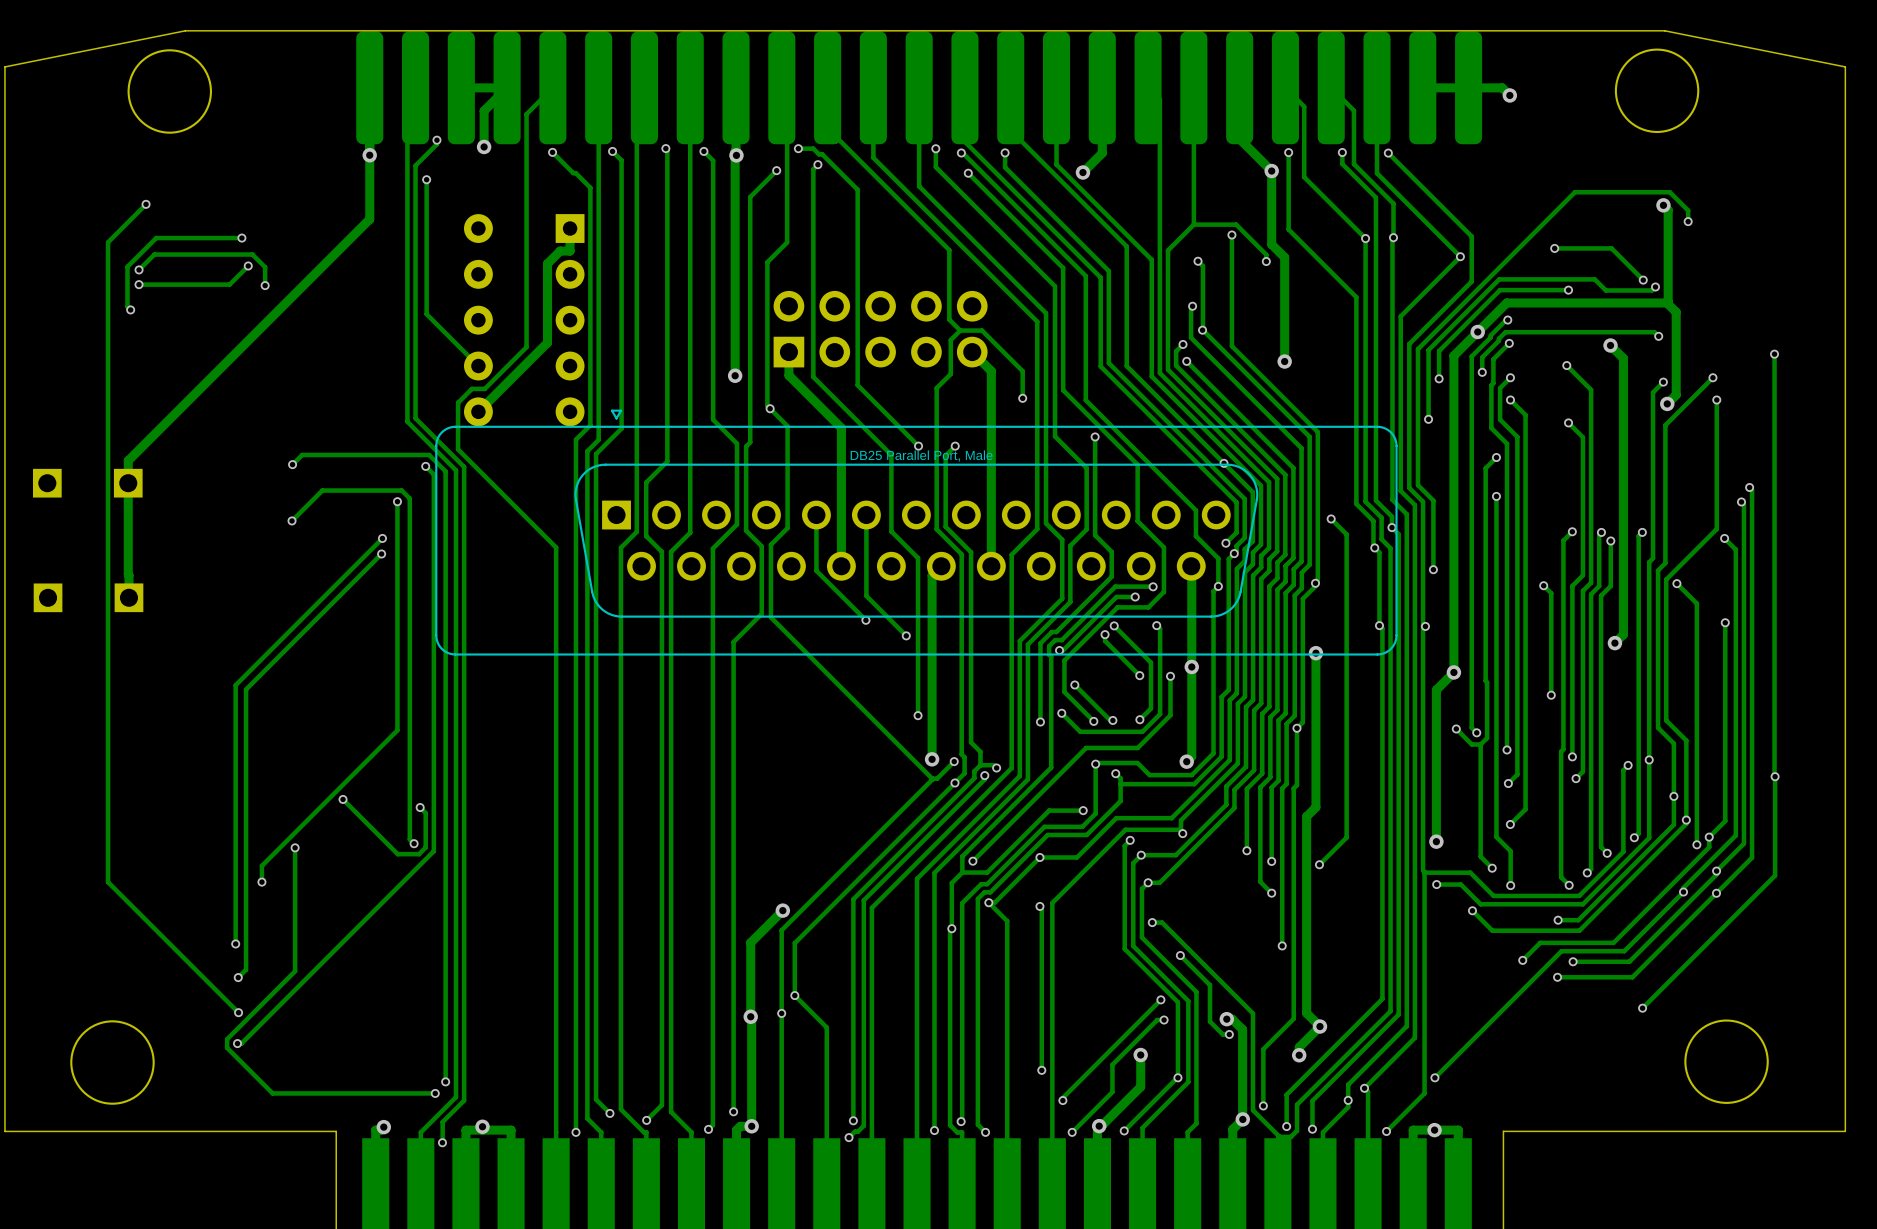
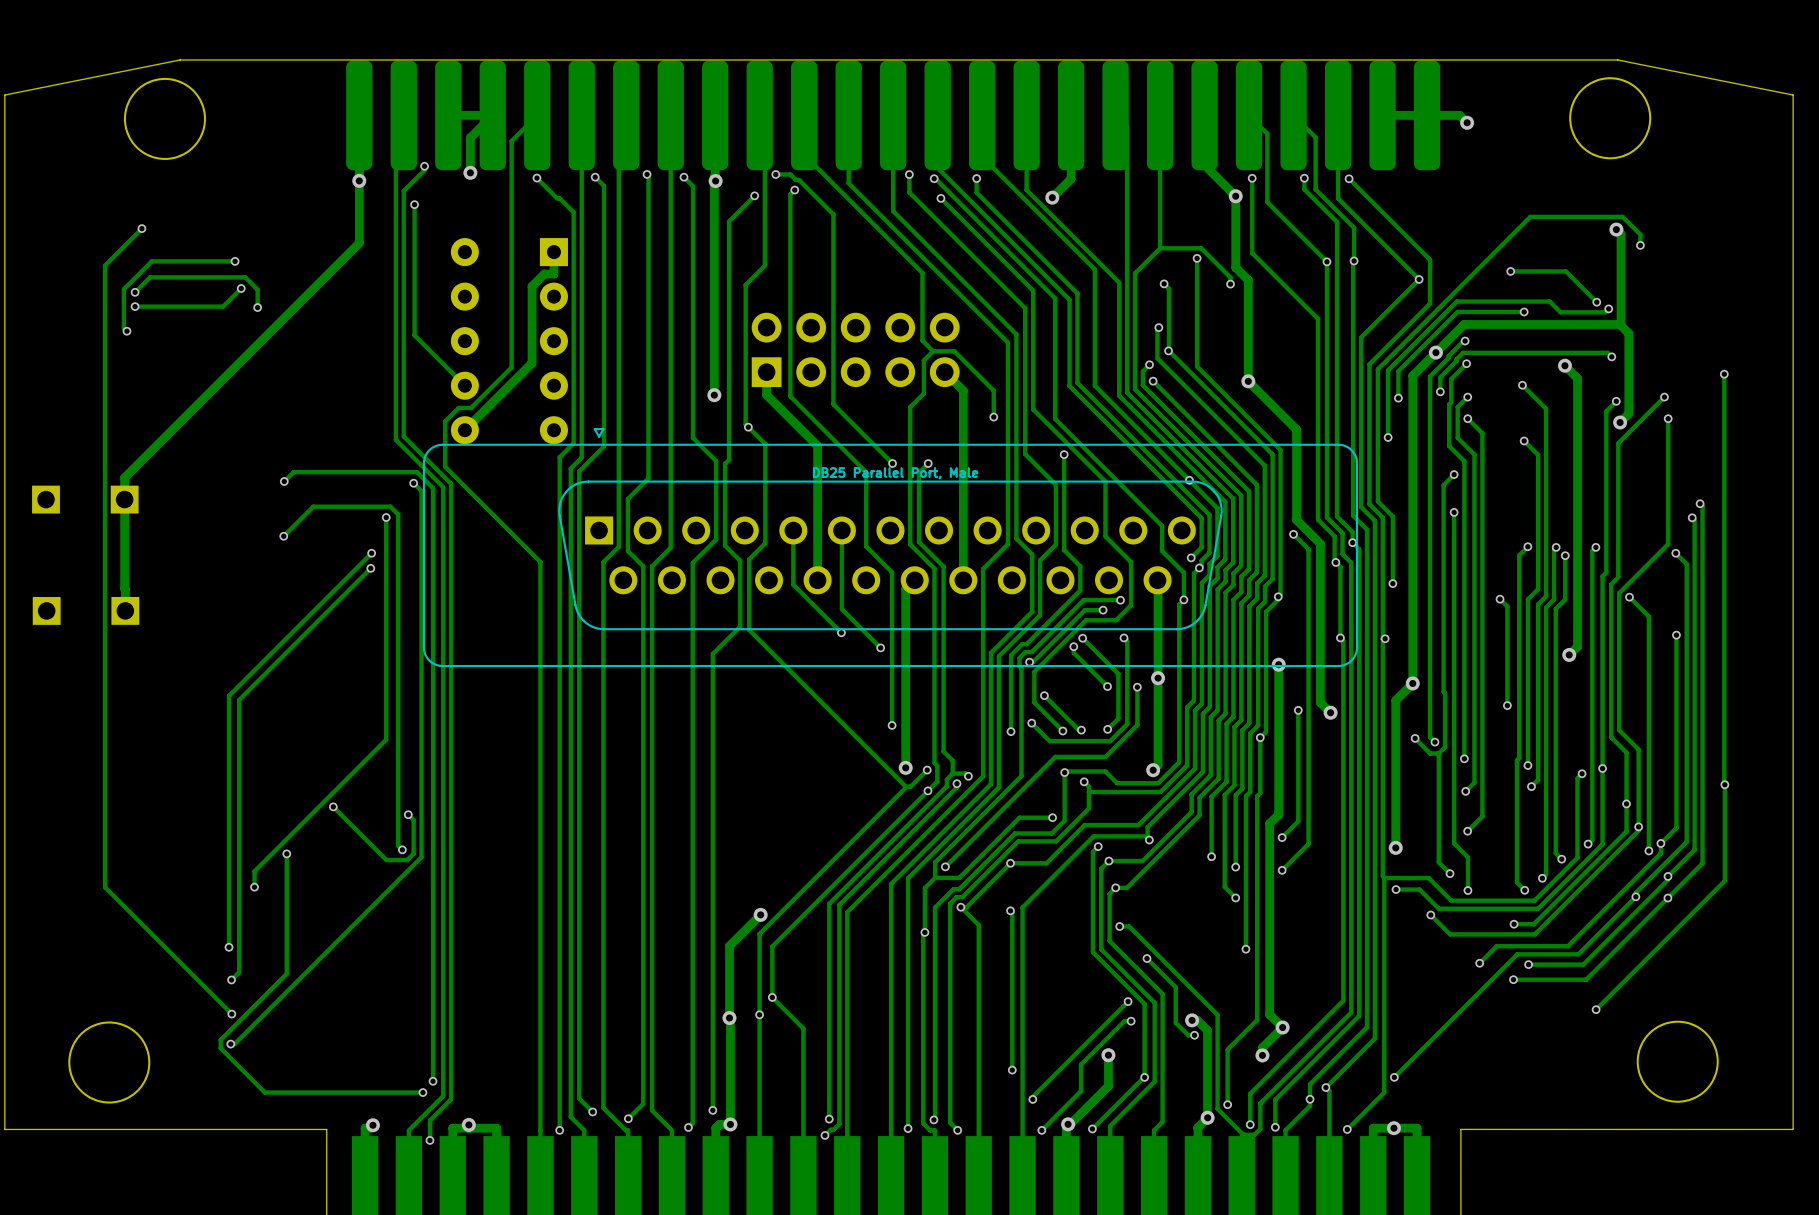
track: none -> (1248, 381) (1296, 429) (1296, 519) (1320, 543) (1320, 702) (1330, 712)
track: none -> (1298, 710) (1298, 821) (1282, 837)
via: none -> (1298, 710)
via: none -> (1330, 712)
via: none -> (1282, 837)

